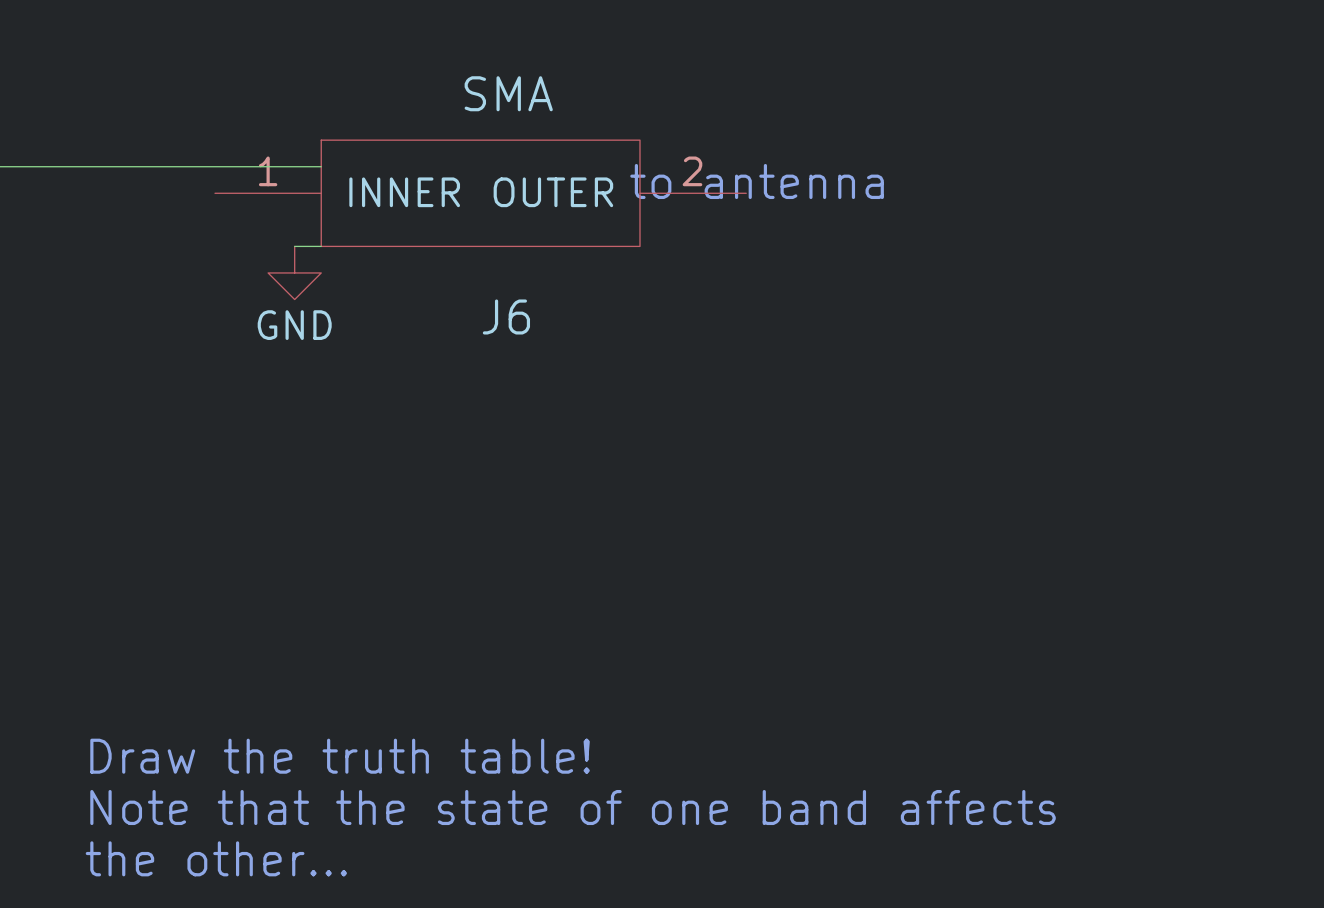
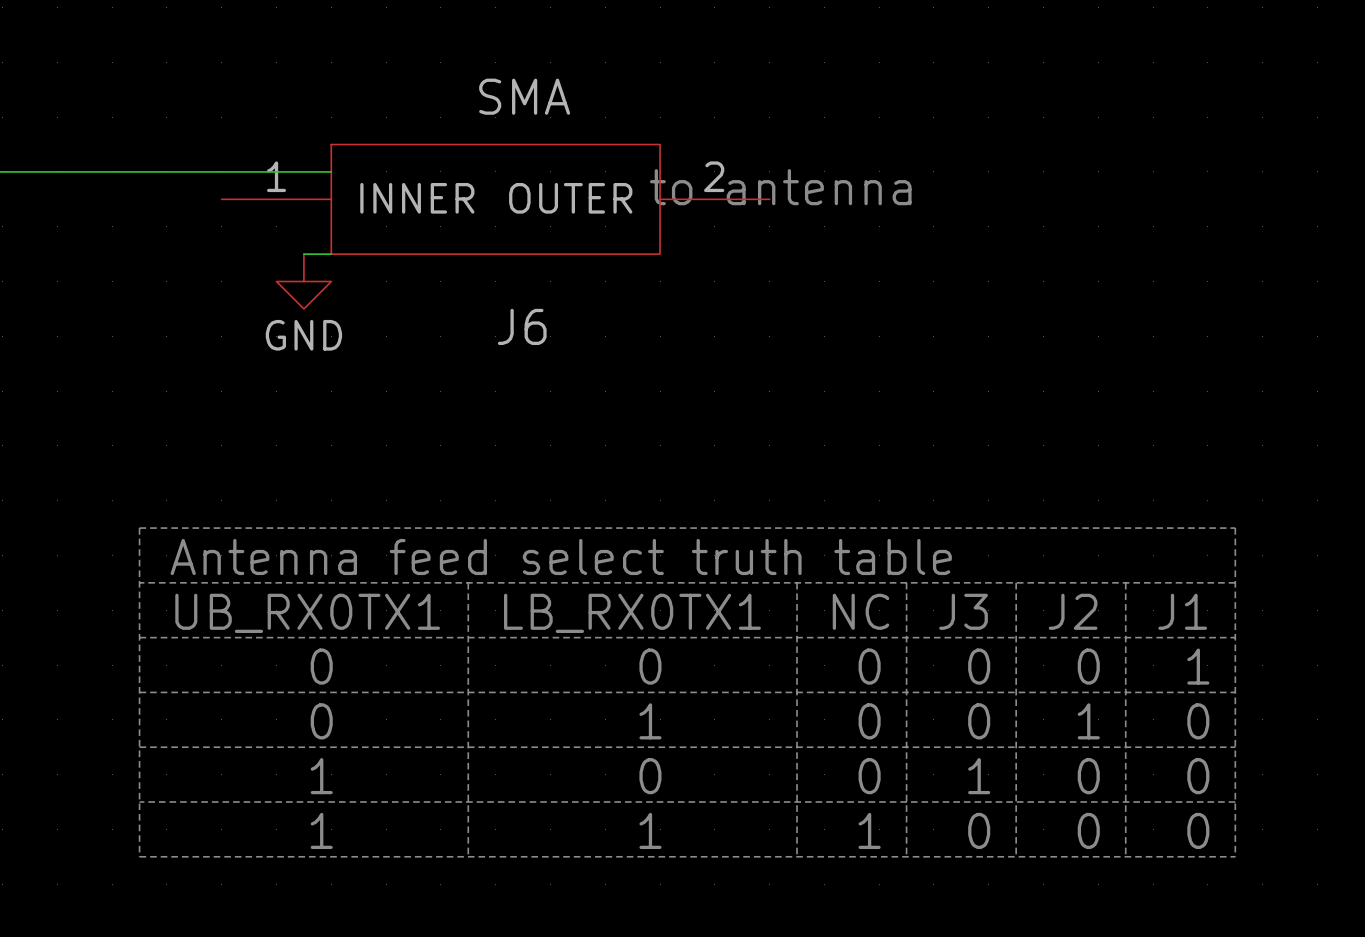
line: none -> (139, 528) (139, 856) (1235, 856) (1235, 528) (139, 528)
text: none -> Antenna feed select truth table (561, 557)
line: none -> (139, 582) (1235, 582)
line: none -> (468, 582) (468, 856)
line: none -> (797, 582) (797, 856)
line: none -> (906, 582) (906, 856)
line: none -> (1016, 582) (1016, 856)
line: none -> (1125, 582) (1125, 856)
text: none -> NC (861, 611)
text: none -> J3 (963, 611)
text: none -> J2 (1073, 611)
text: none -> J1 (1182, 611)
text: none -> UB_RX0TX1 (307, 613)
text: none -> LB_RX0TX1 (632, 613)
line: none -> (139, 637) (1235, 637)
text: none -> 0 (321, 666)
text: none -> 0 (650, 666)
text: none -> 0 (869, 666)
text: none -> 0 (979, 666)
text: none -> 0 (1088, 666)
text: none -> 1 (1198, 666)
line: none -> (139, 692) (1235, 692)
text: none -> 0 (321, 721)
text: none -> 1 (650, 721)
text: none -> 0 (869, 721)
text: none -> 0 (979, 721)
text: none -> 1 (1088, 721)
text: none -> 0 (1198, 721)
line: none -> (139, 747) (1235, 747)
text: none -> 1 (321, 776)
text: none -> 0 (650, 776)
text: none -> 0 (869, 776)
text: none -> 1 (979, 776)
text: none -> 0 (1088, 776)
text: none -> 0 (1198, 776)
text: Draw the truth table! (340, 756) -> none
line: none -> (139, 802) (1235, 802)
text: none -> 1 (321, 830)
text: none -> 1 (650, 830)
text: none -> 1 (869, 830)
text: none -> 0 (979, 830)
text: none -> 0 (1088, 830)
text: none -> 0 (1198, 830)
text: Note that the state of one band affects (573, 807) -> none
text: the other... (216, 858) -> none

